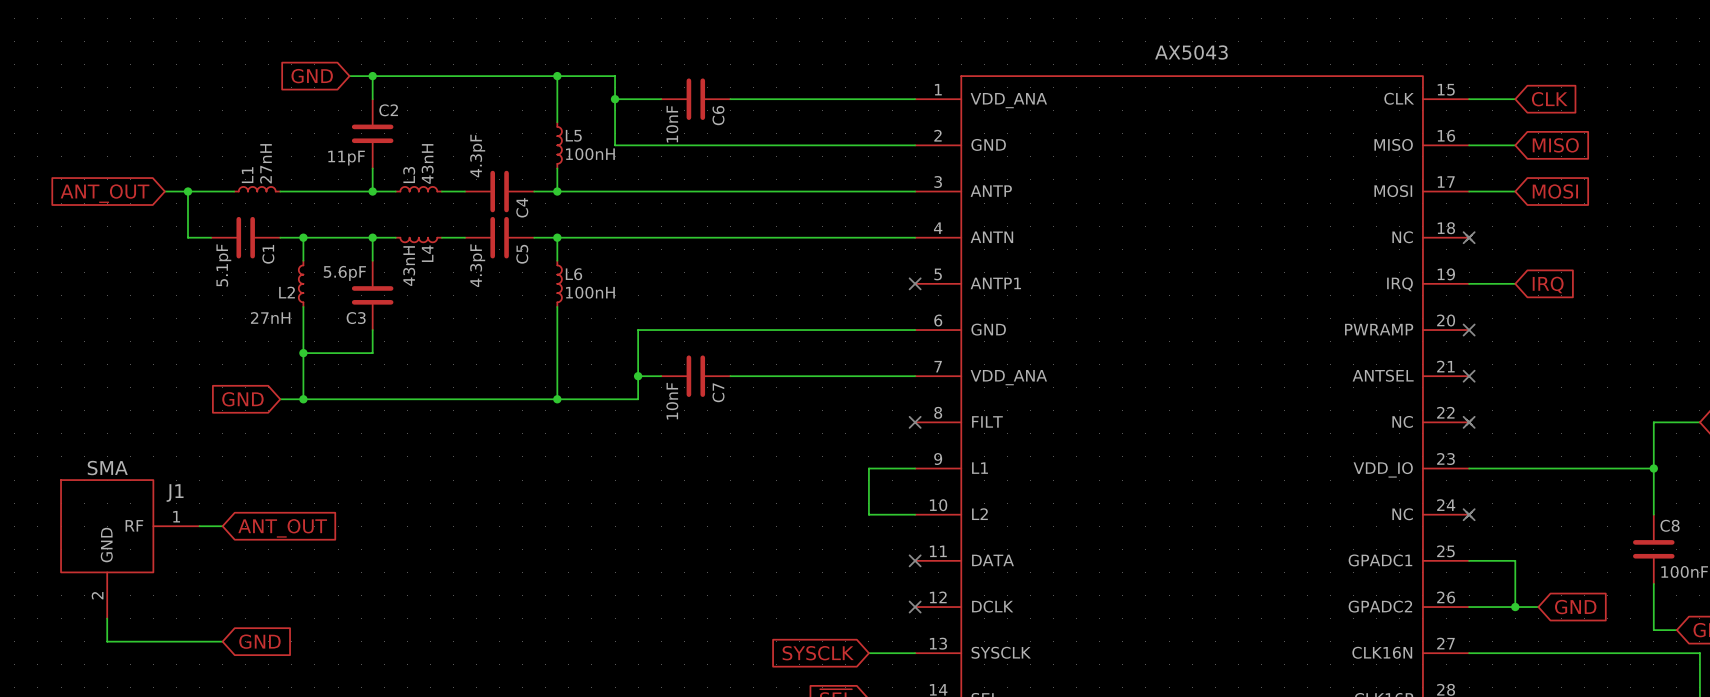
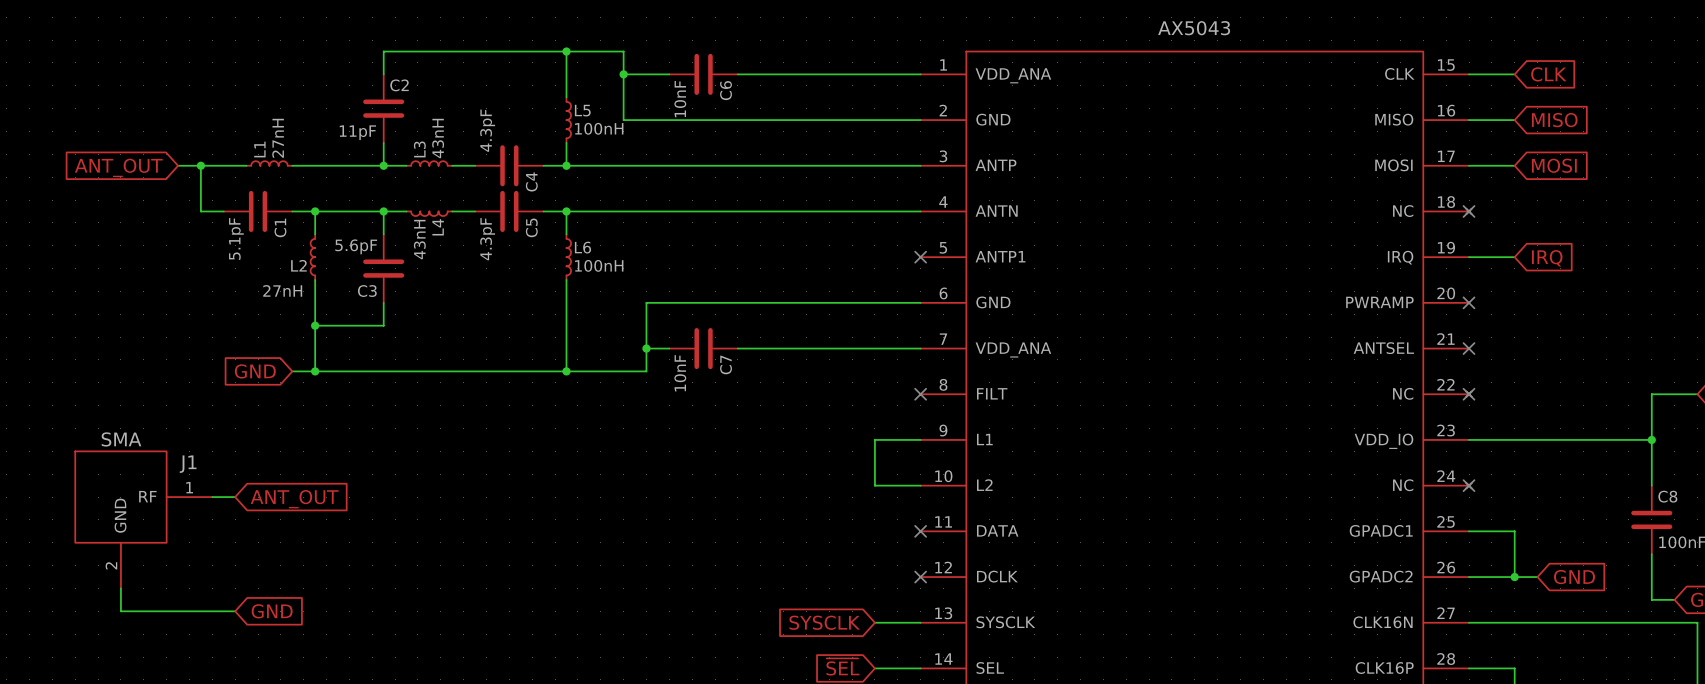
global label: GND (312, 76) -> none
wire: (349, 76) (372, 76) -> none
junction: (372, 76) -> none

